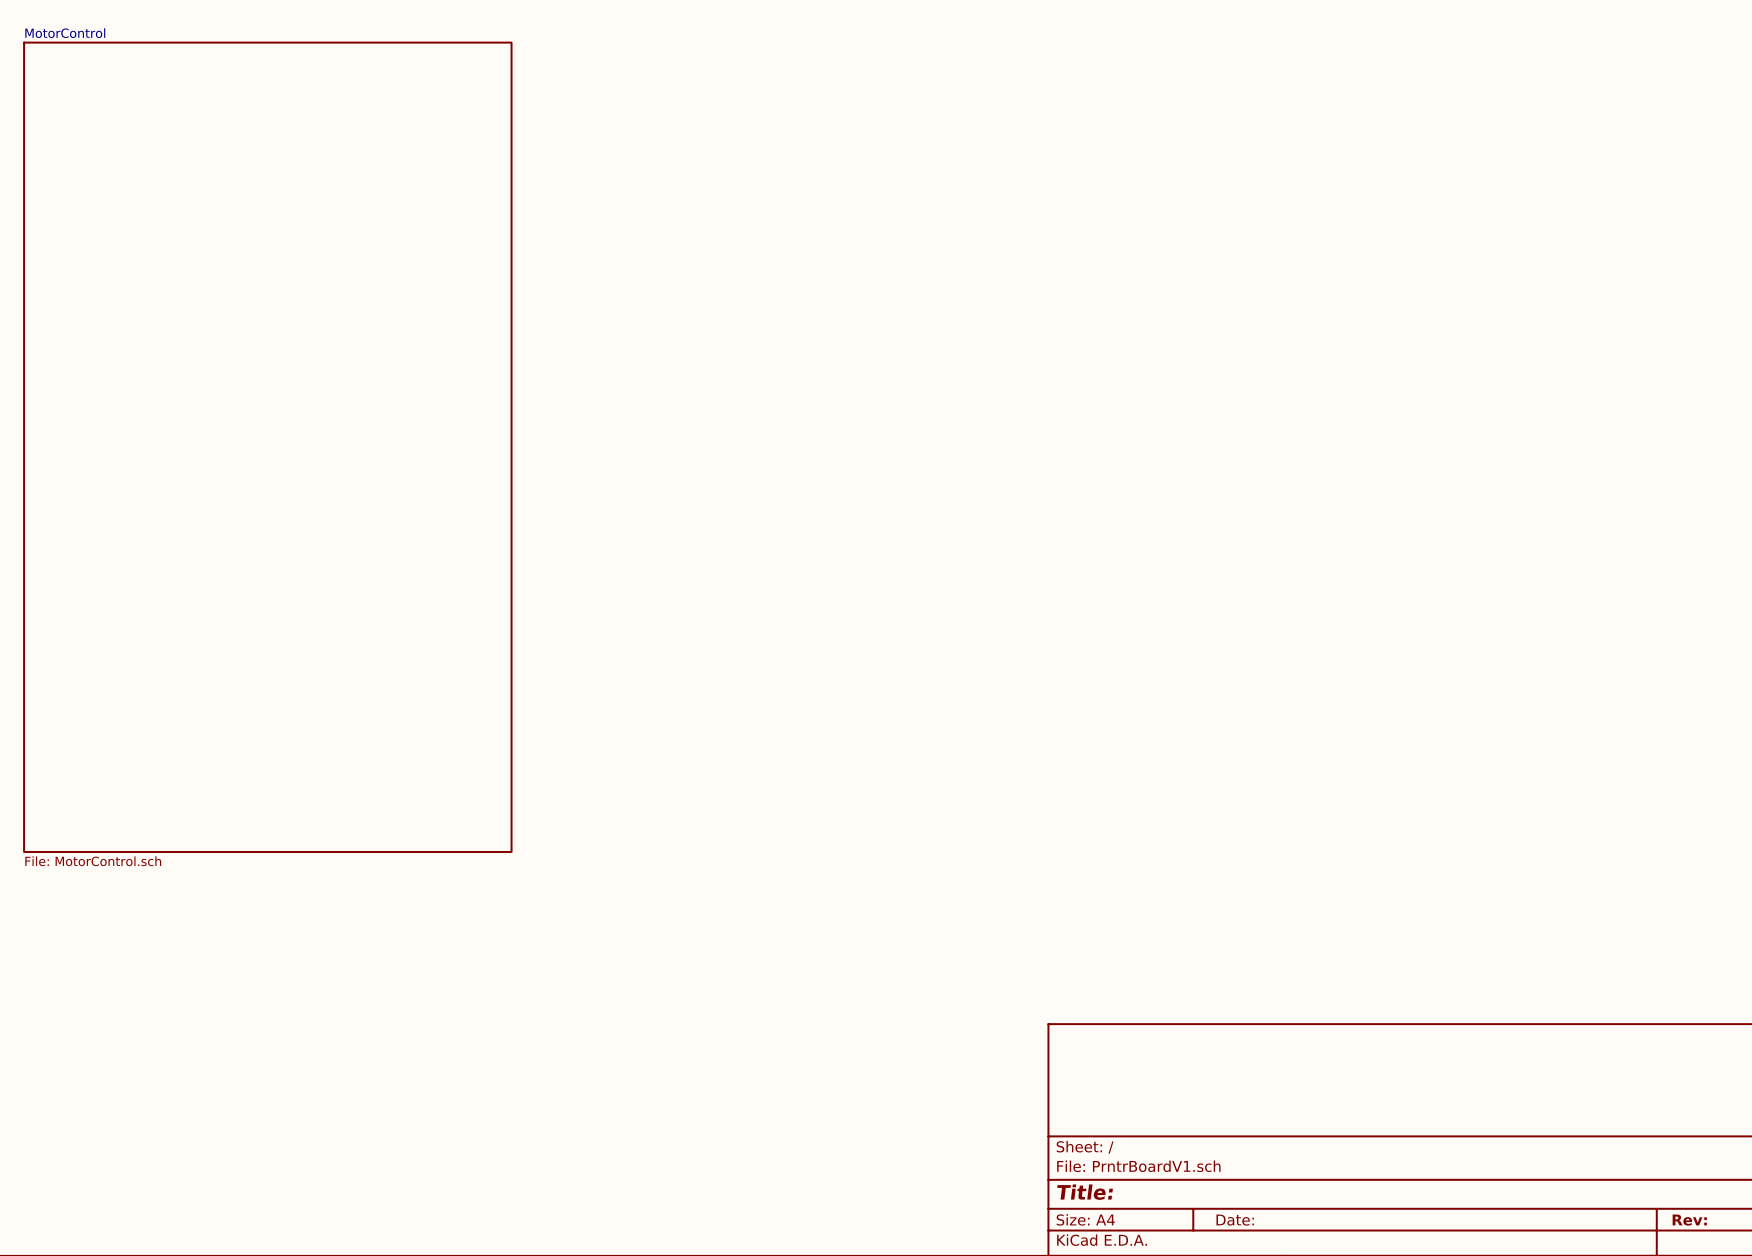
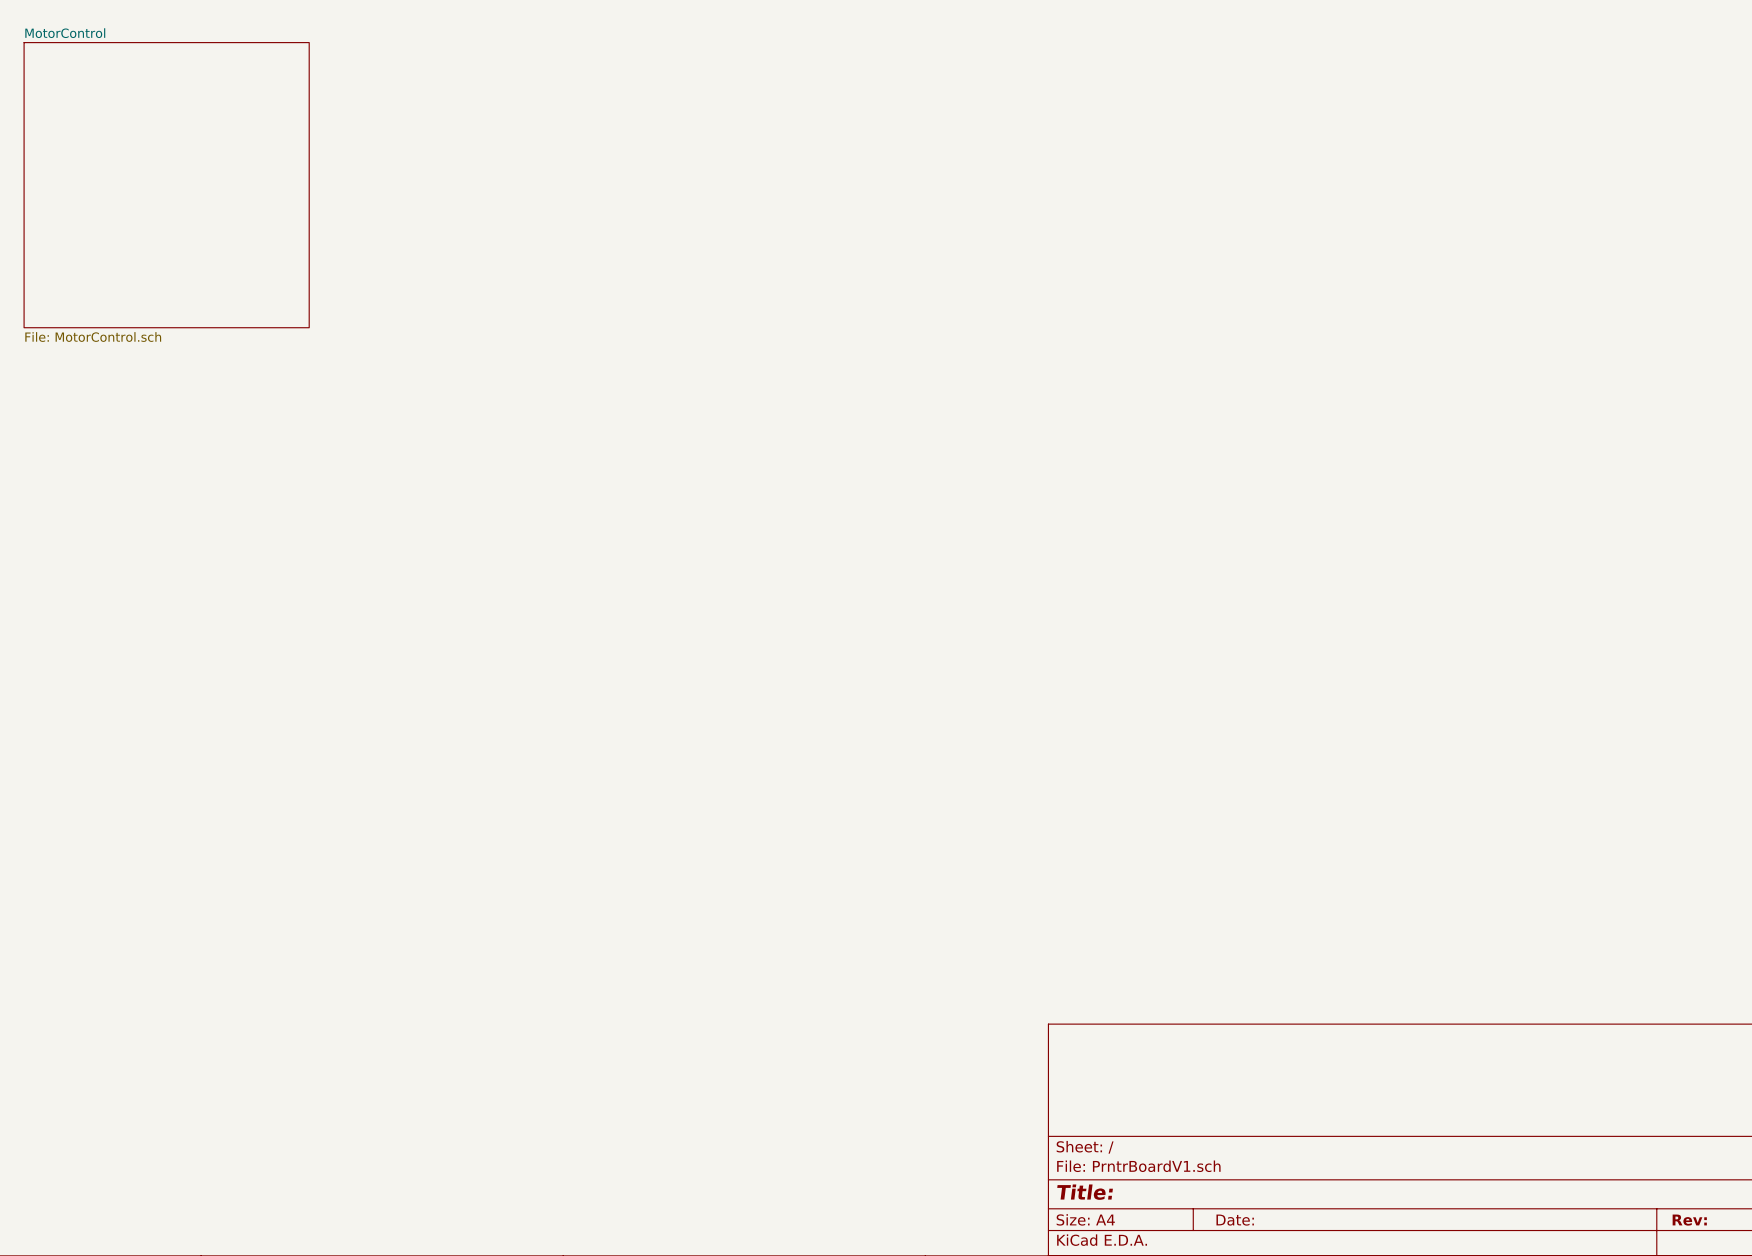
sheet MotorControl: none -> File: MotorControl.sch (166, 185)
sheet MotorControl: File: MotorControl.sch (267, 447) -> none

